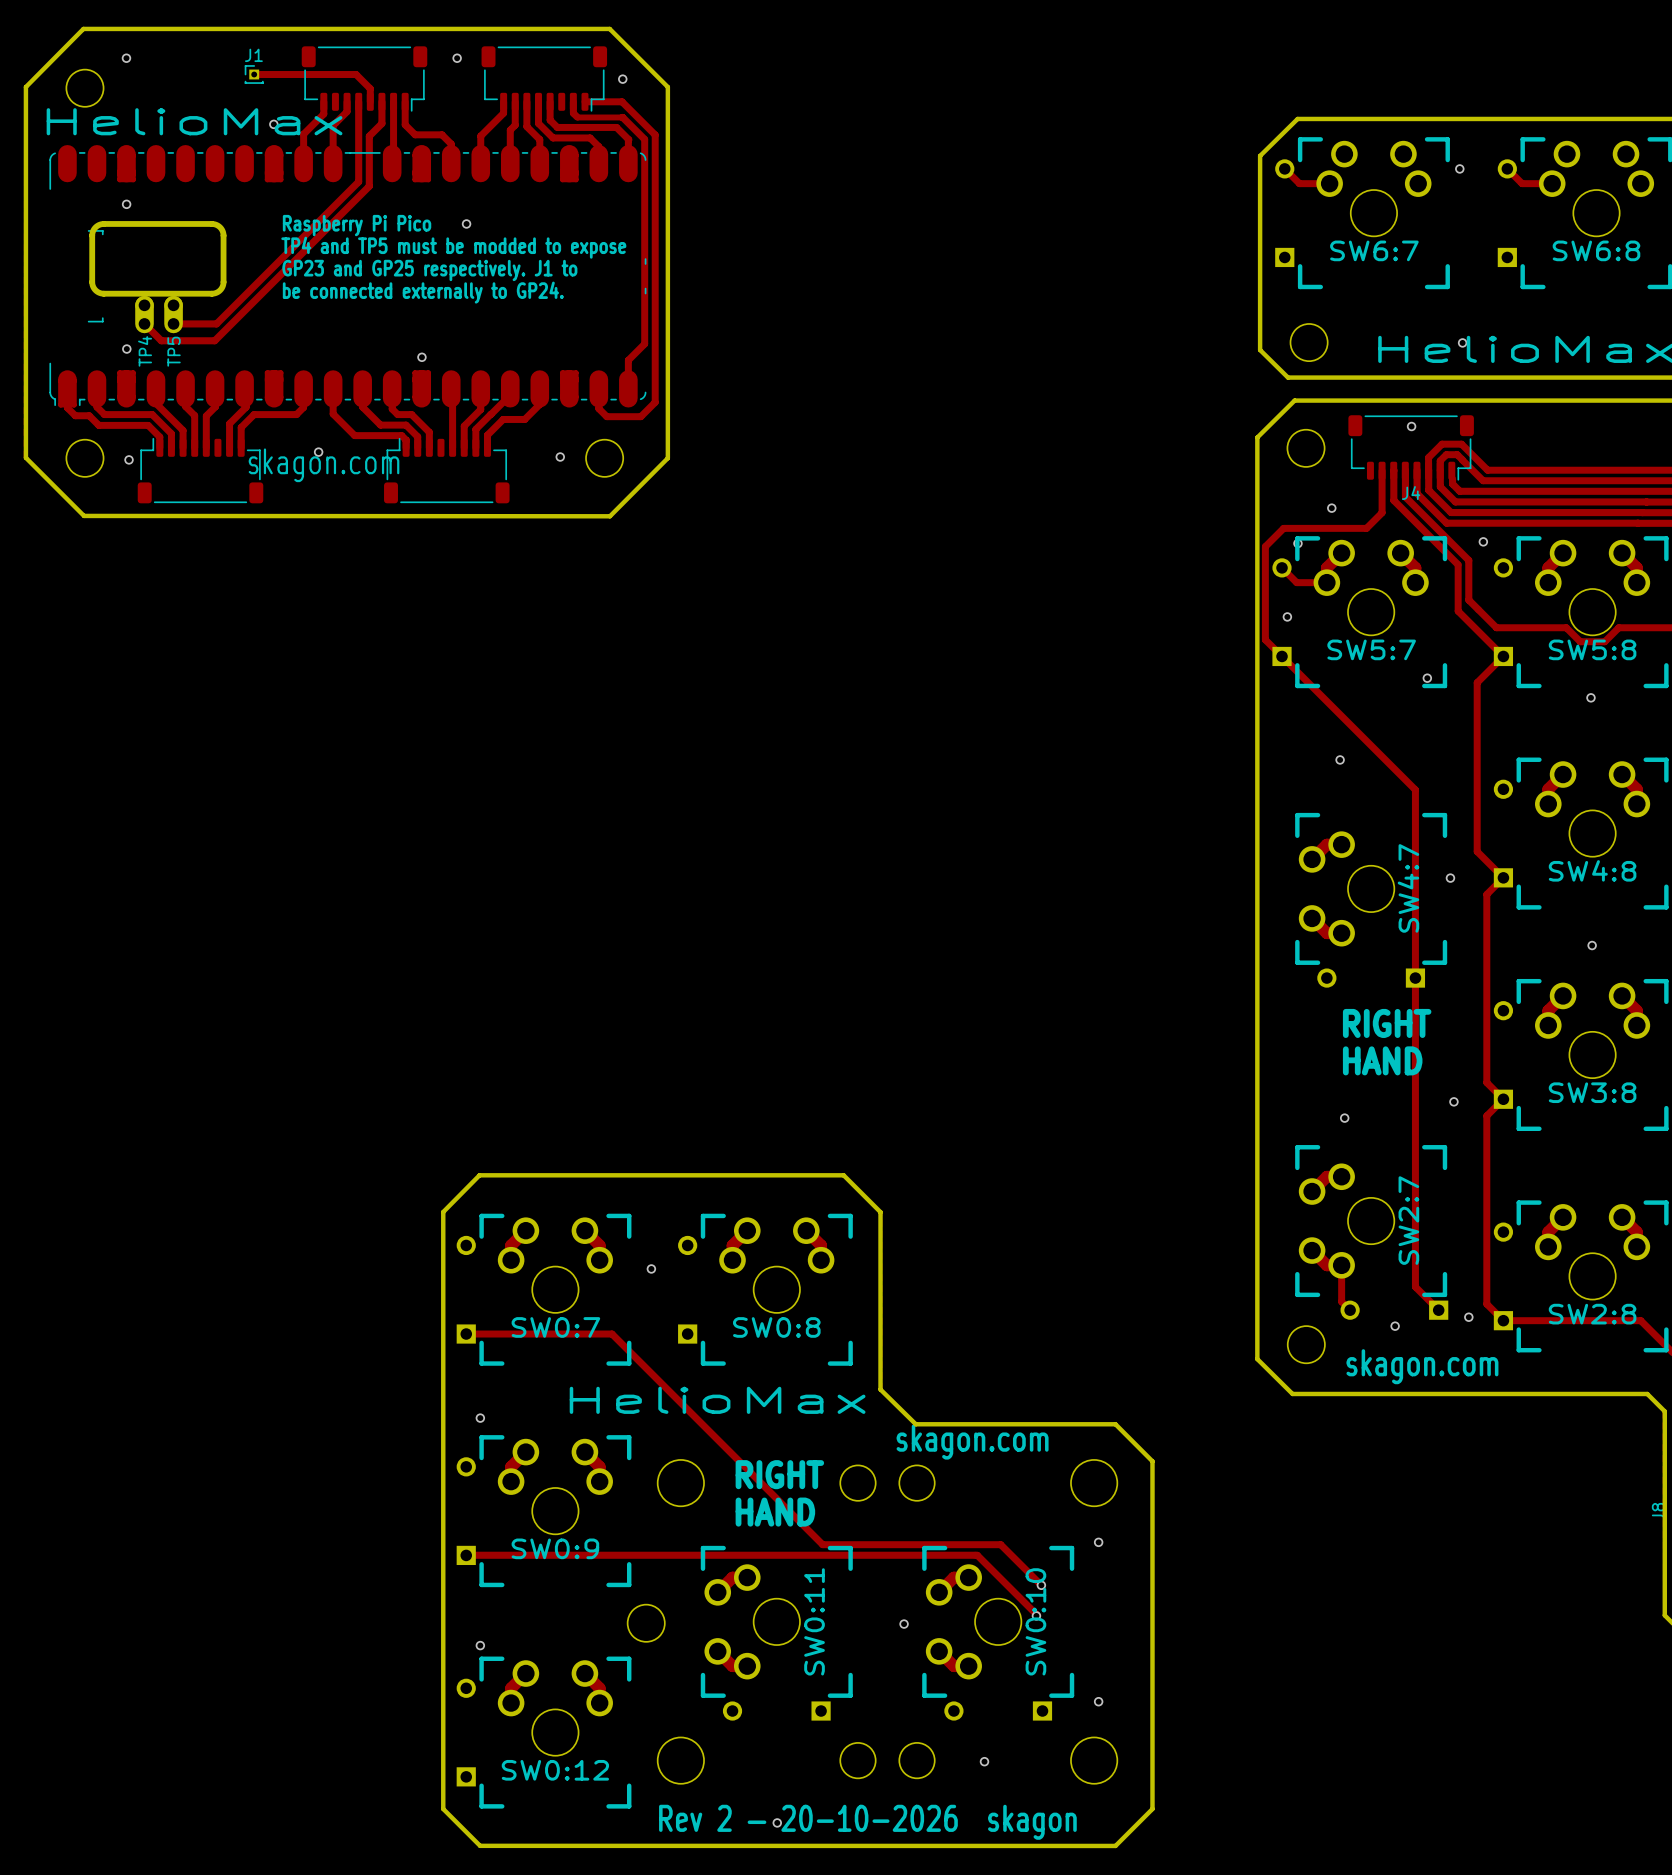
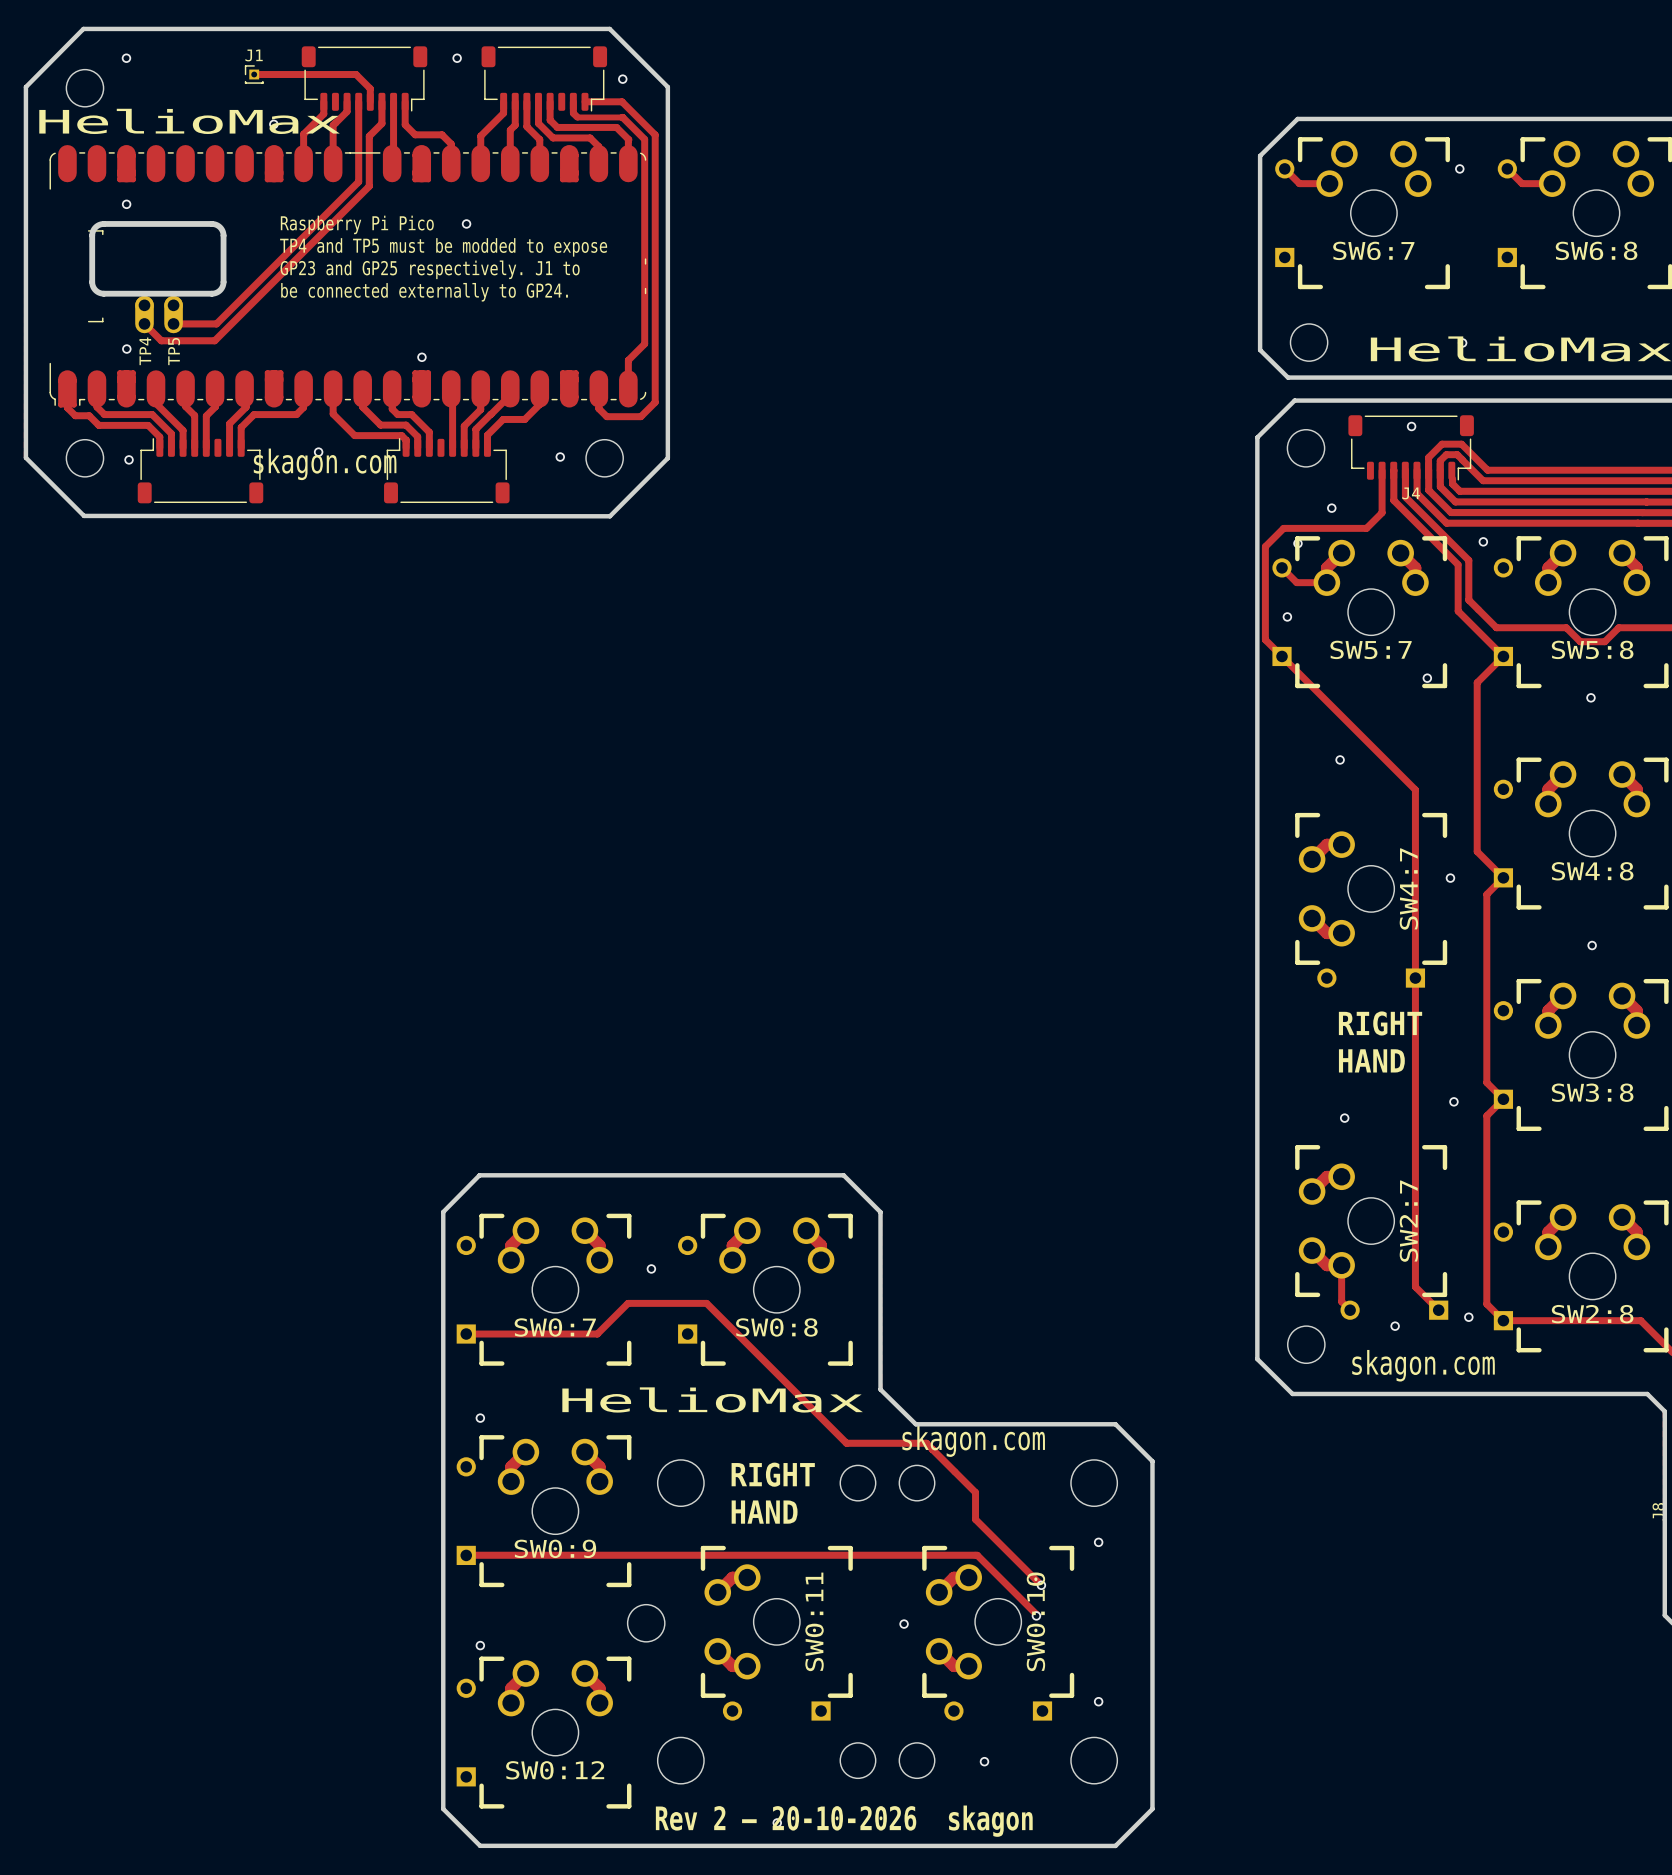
track: (597, 1334) (612, 1334) (822, 1544) (1000, 1544) -> (597, 1334) (628, 1303) (706, 1303) (846, 1443) (926, 1443) (975, 1492) (975, 1519) (1000, 1544)

